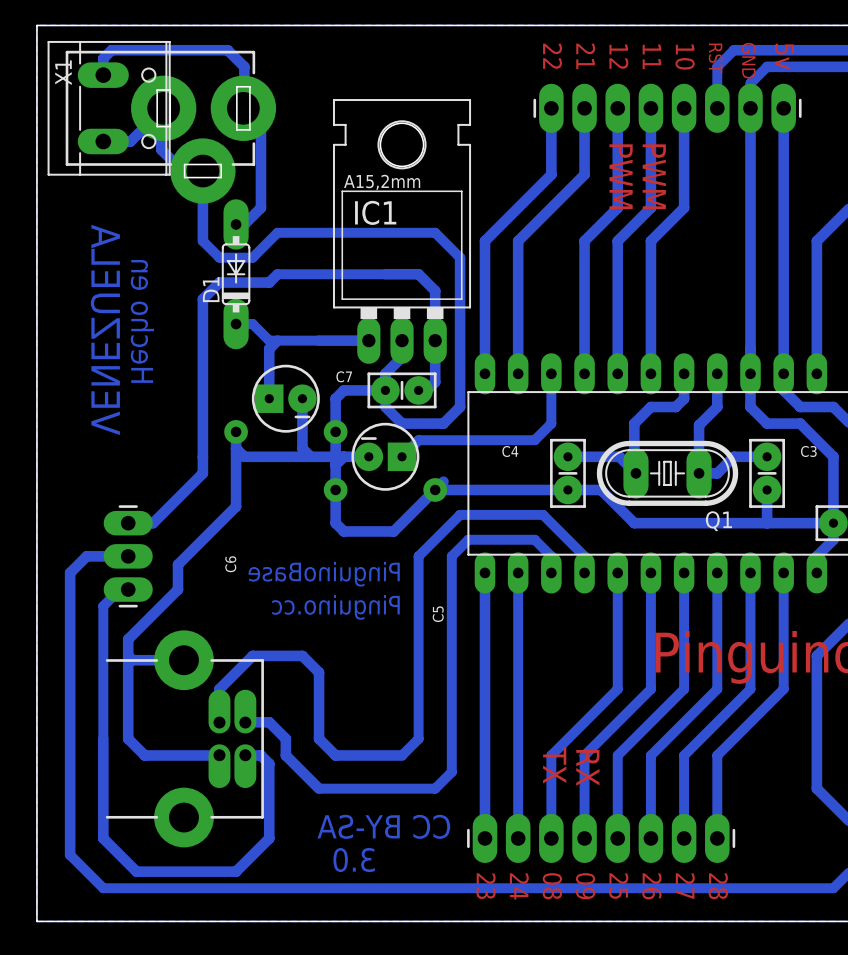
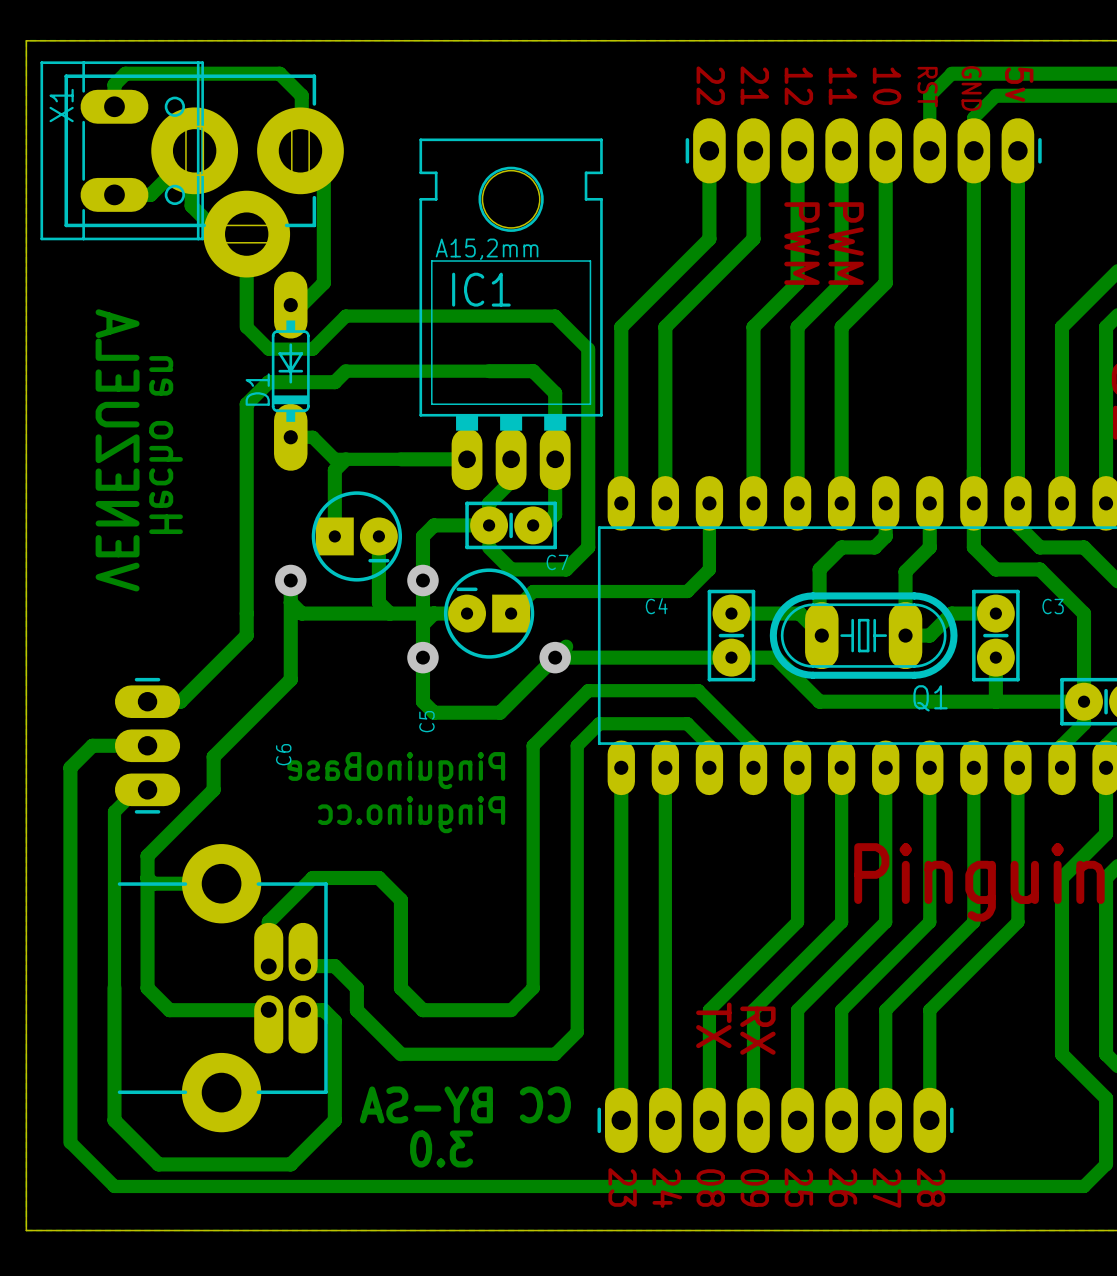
C7 name position: C7 (344, 376) -> C7 (557, 562)
C5 name position: C5 (438, 614) -> C5 (426, 721)

